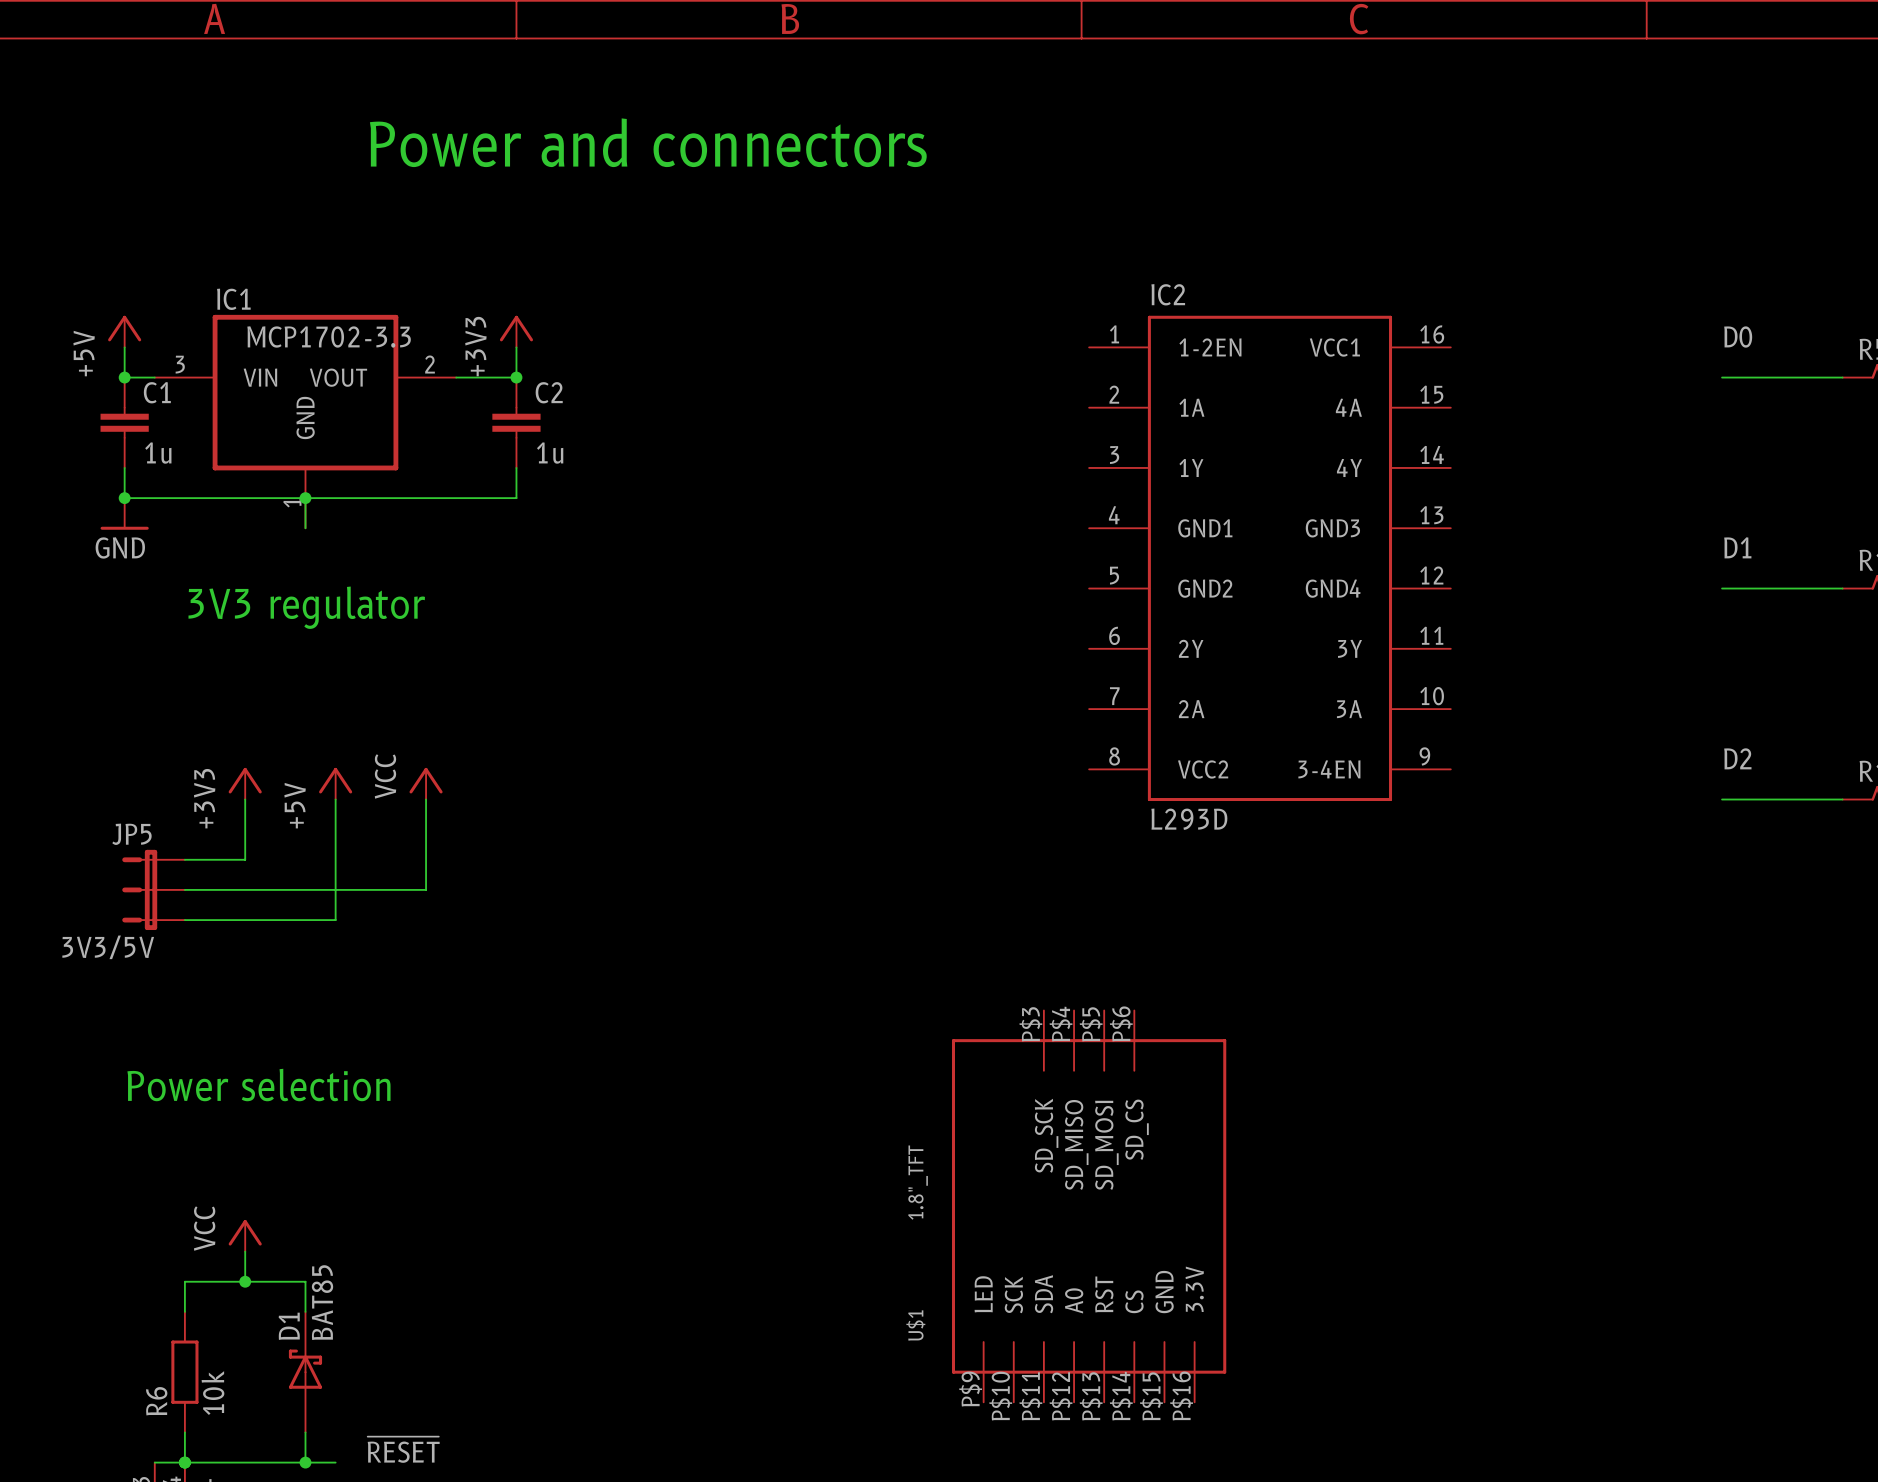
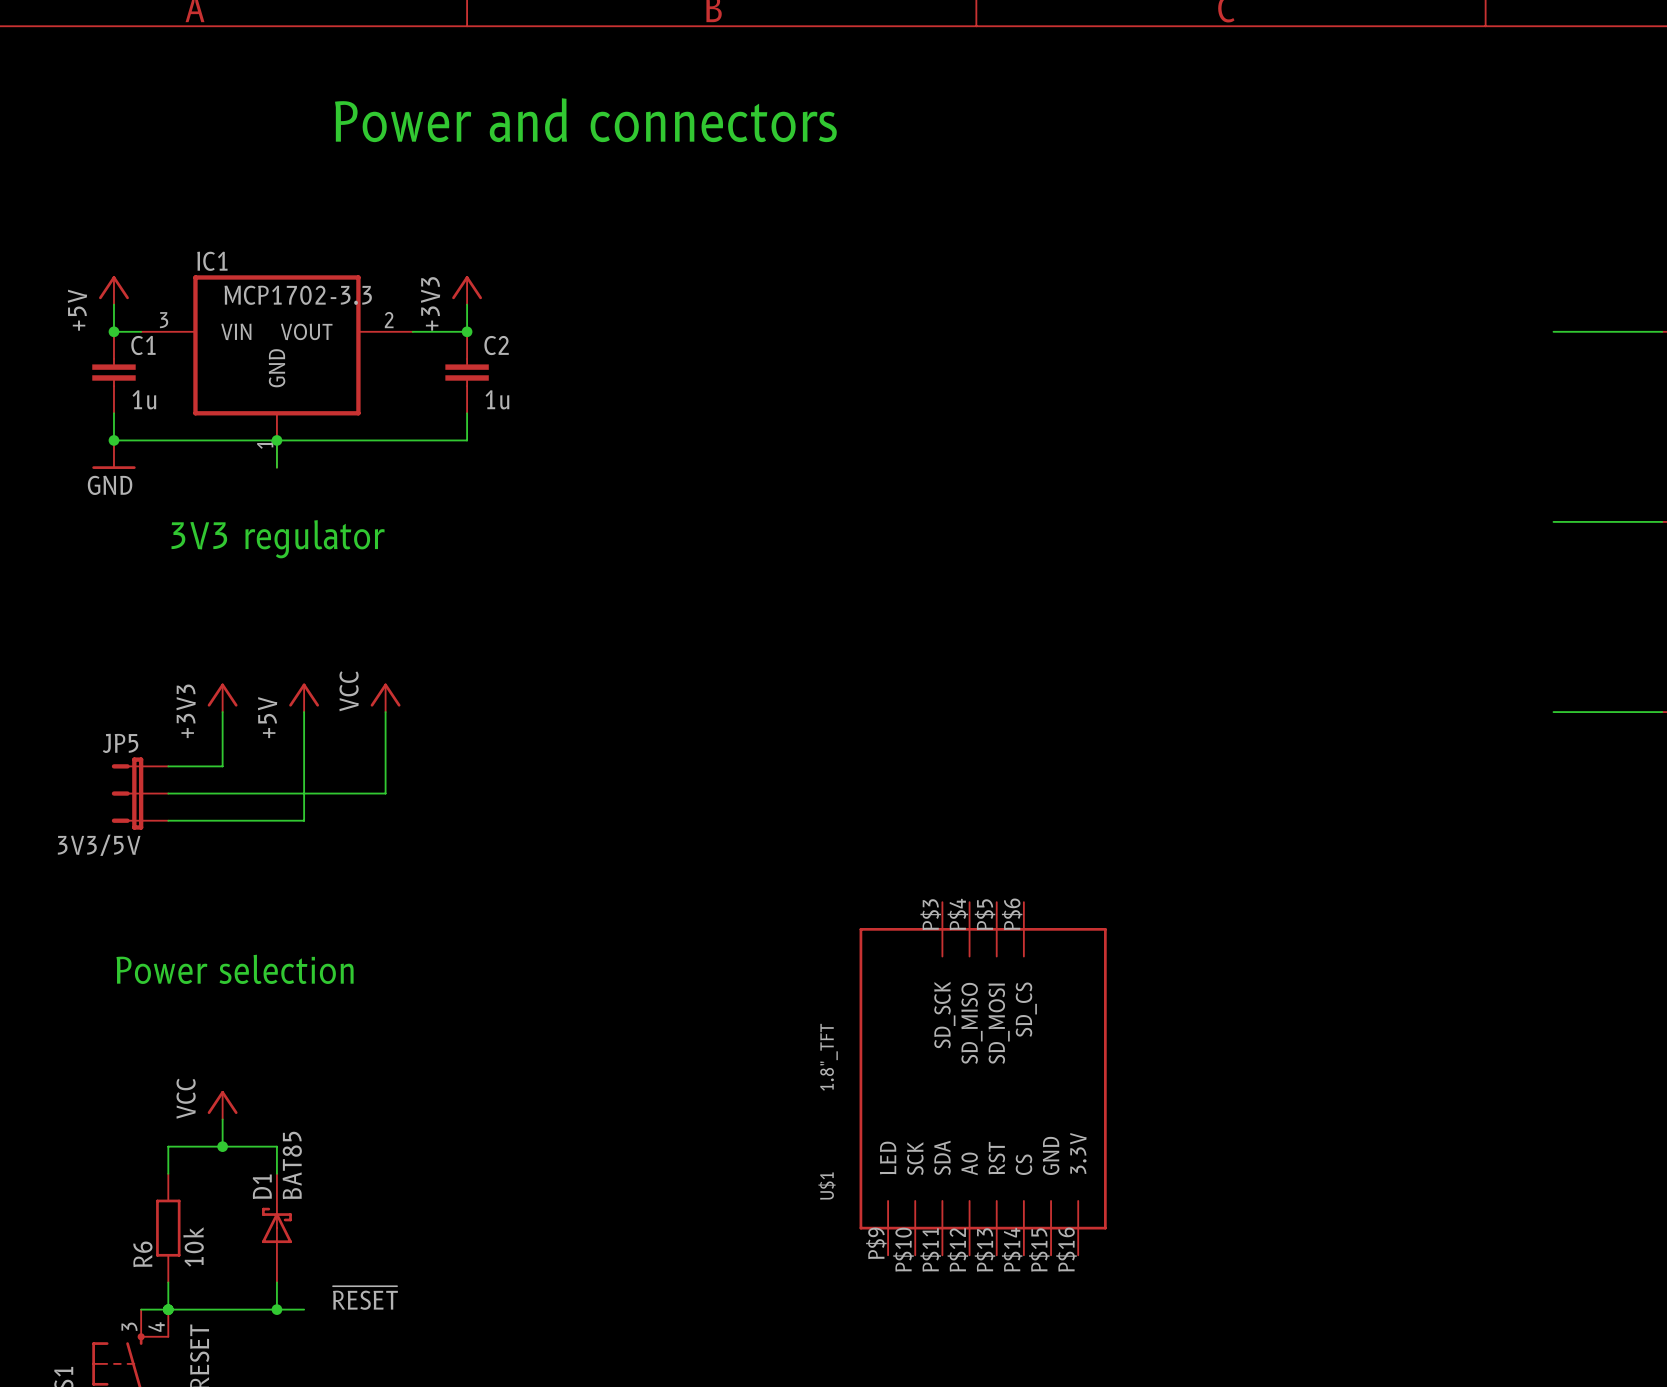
label: D0 (1738, 337) -> none
label: D1 (1737, 547) -> none
IC2: L293D (1269, 558) -> none
label: D2 (1737, 758) -> none

